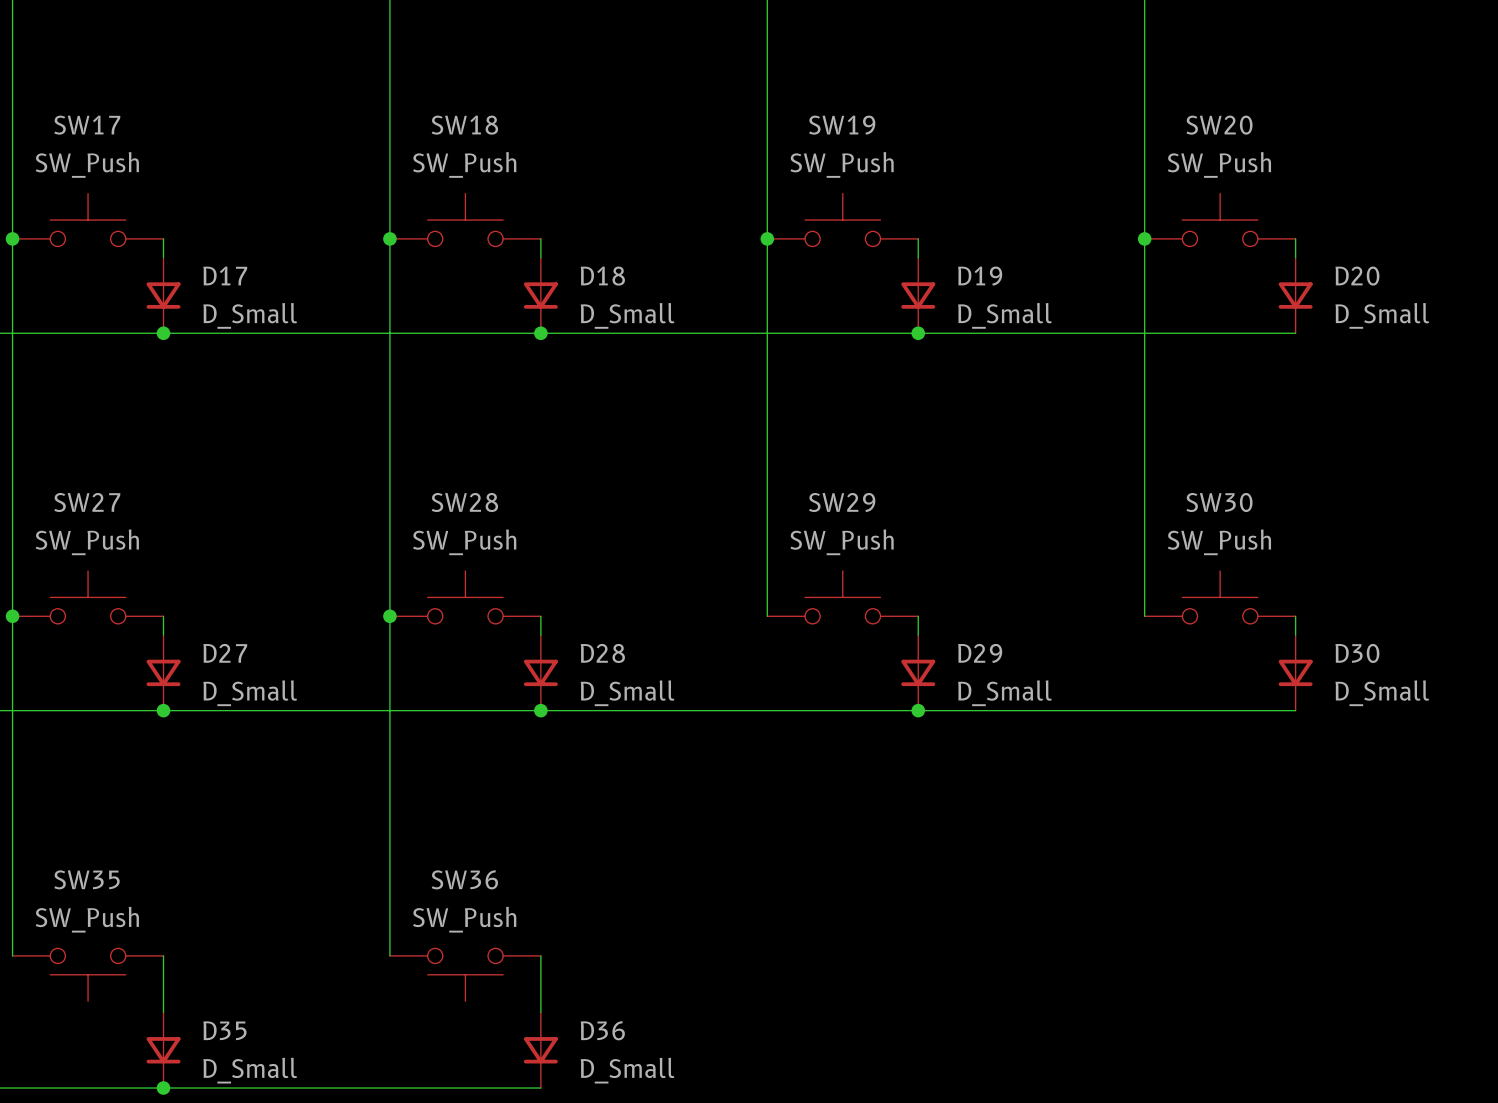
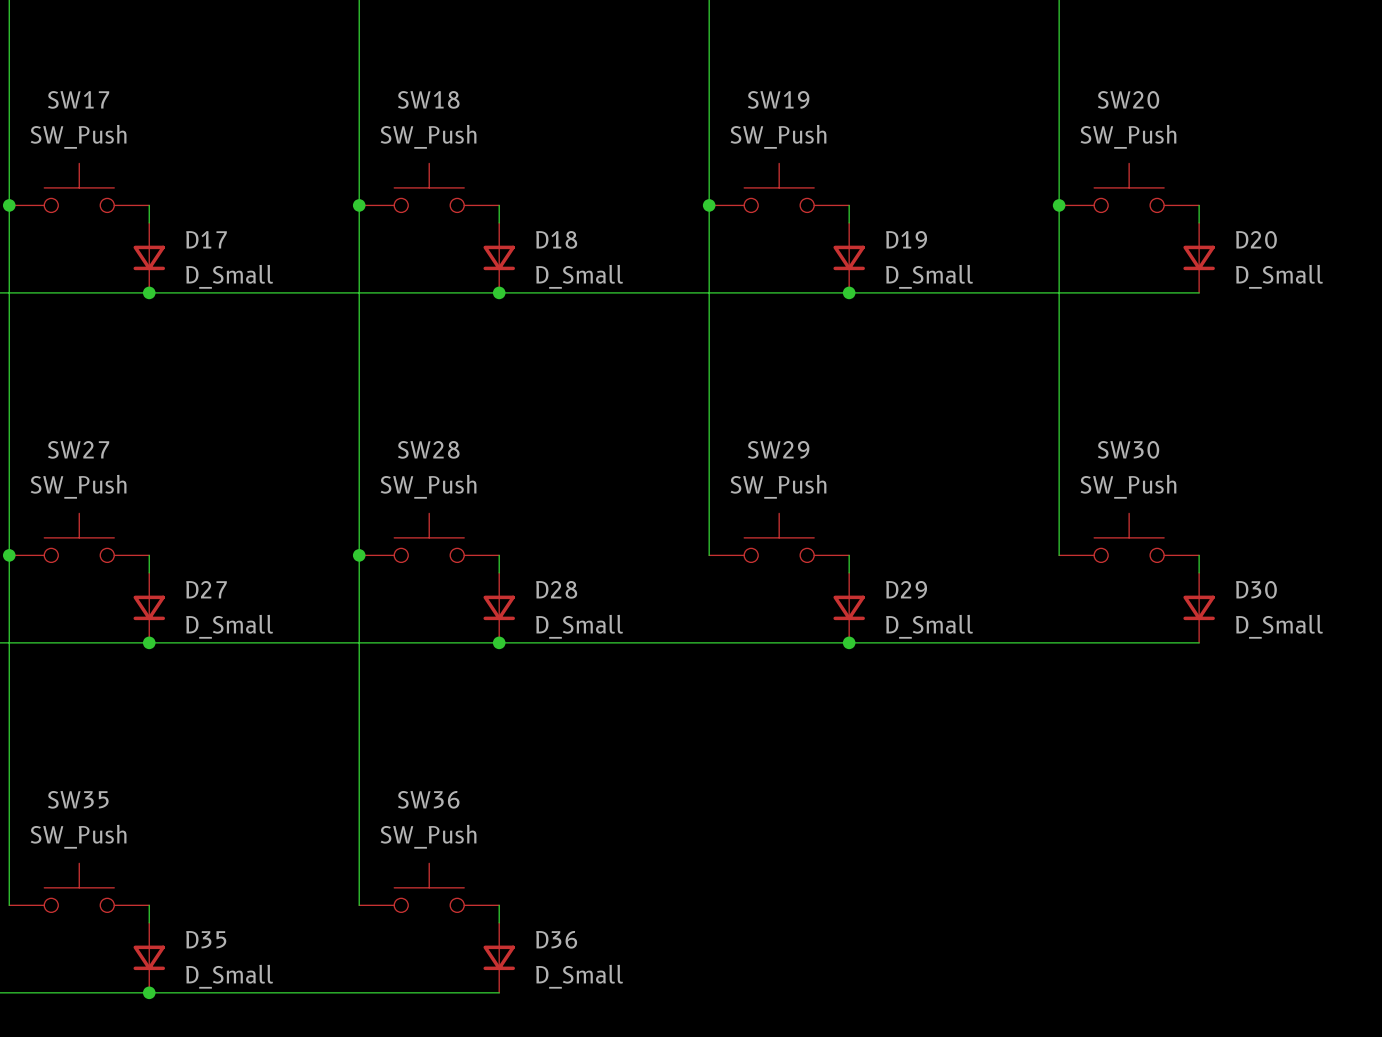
wire: (163, 955) (163, 993) -> (9, 870) (9, 905)
wire: (540, 955) (540, 993) -> (359, 870) (359, 905)
SW35 rotation: 0° (88, 974) -> 180° (79, 887)
SW36 rotation: 0° (465, 974) -> 180° (429, 887)

